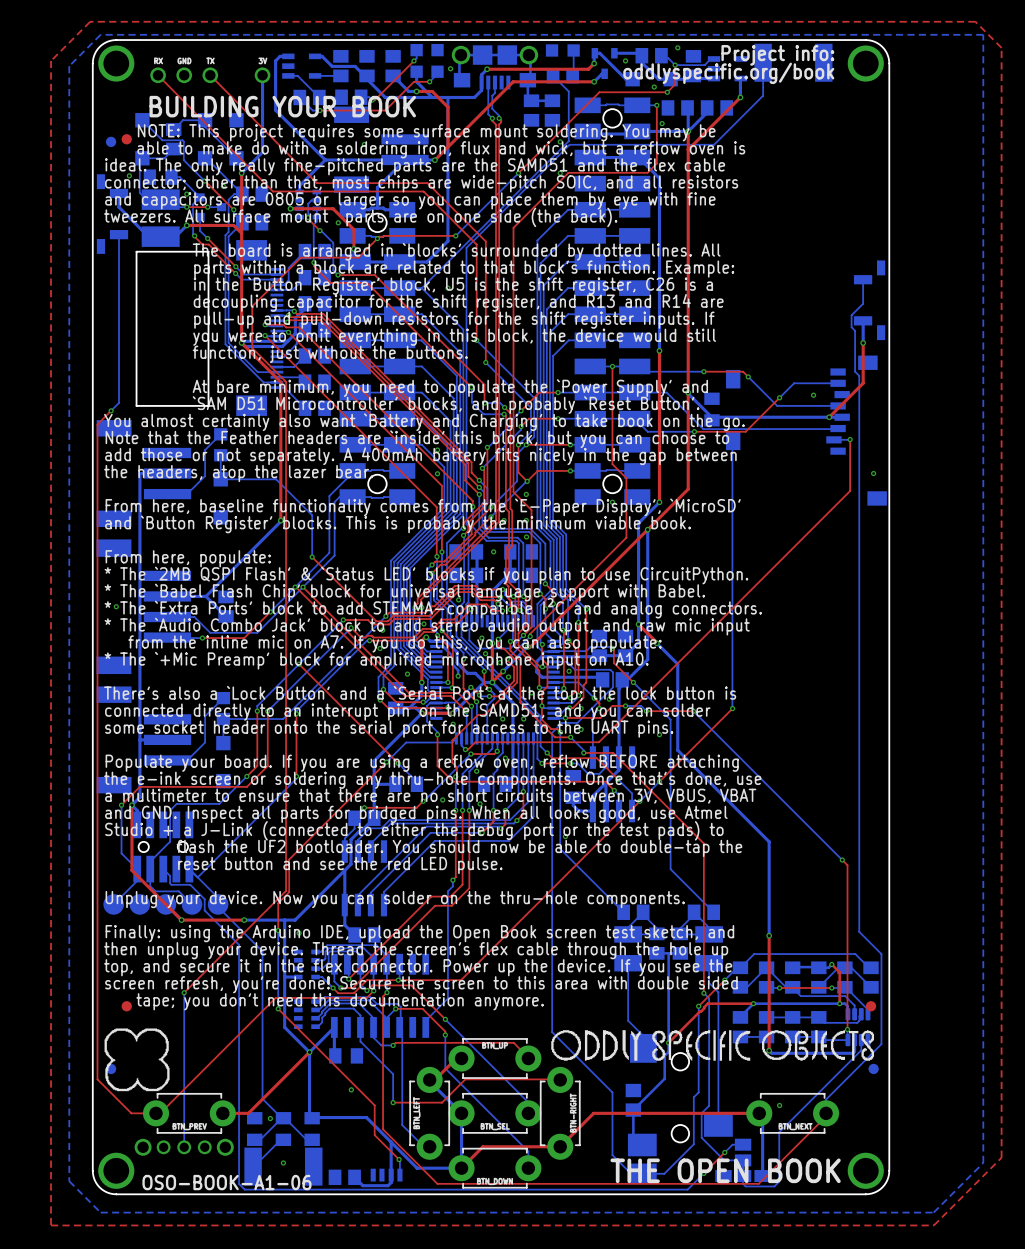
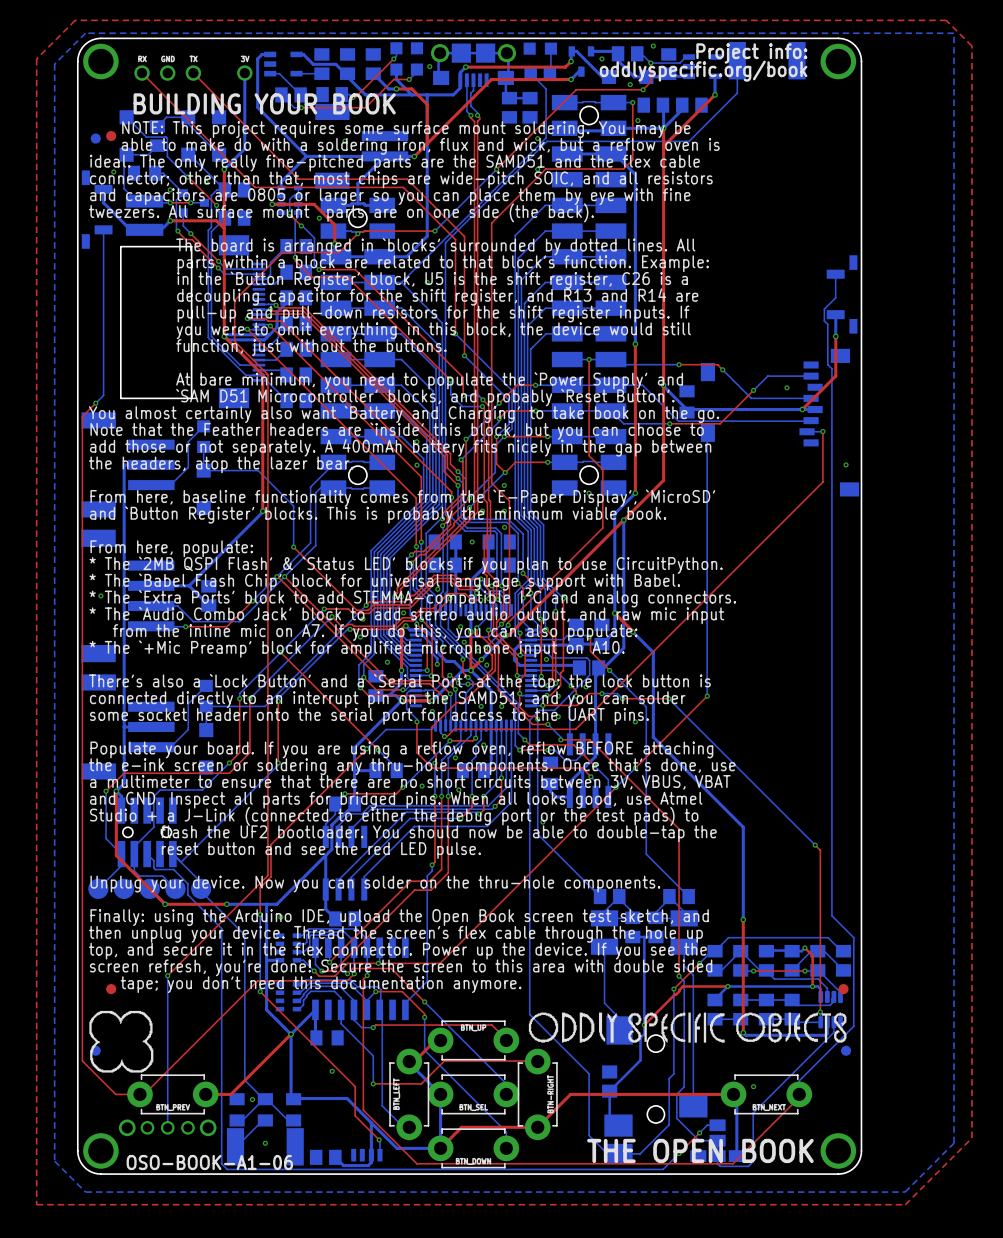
part footprint: [141, 189, 180, 247] -> [125, 195, 164, 236]

